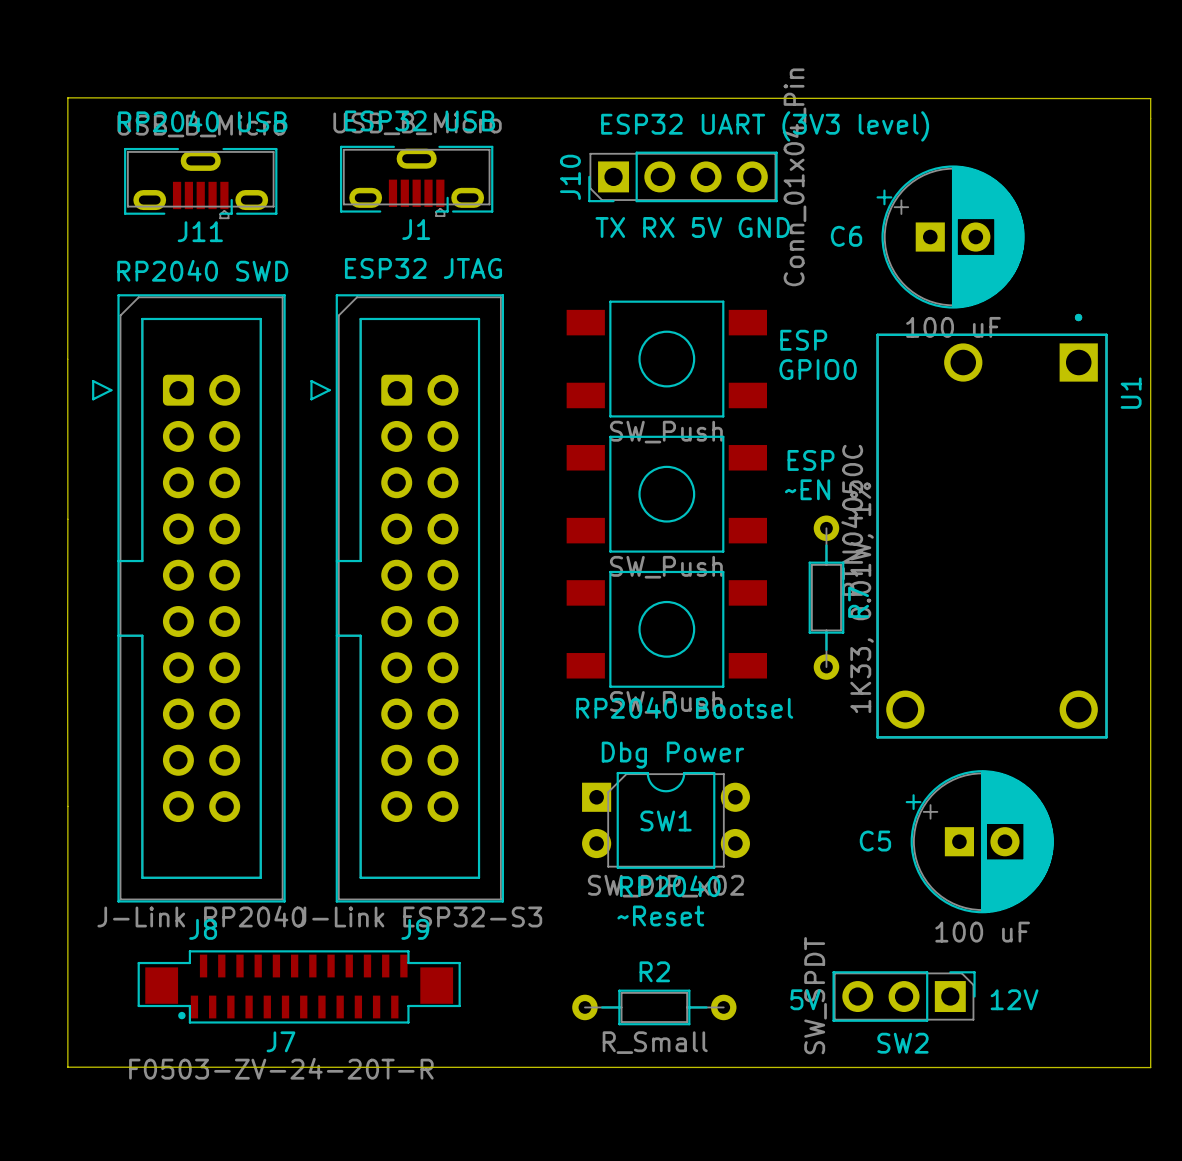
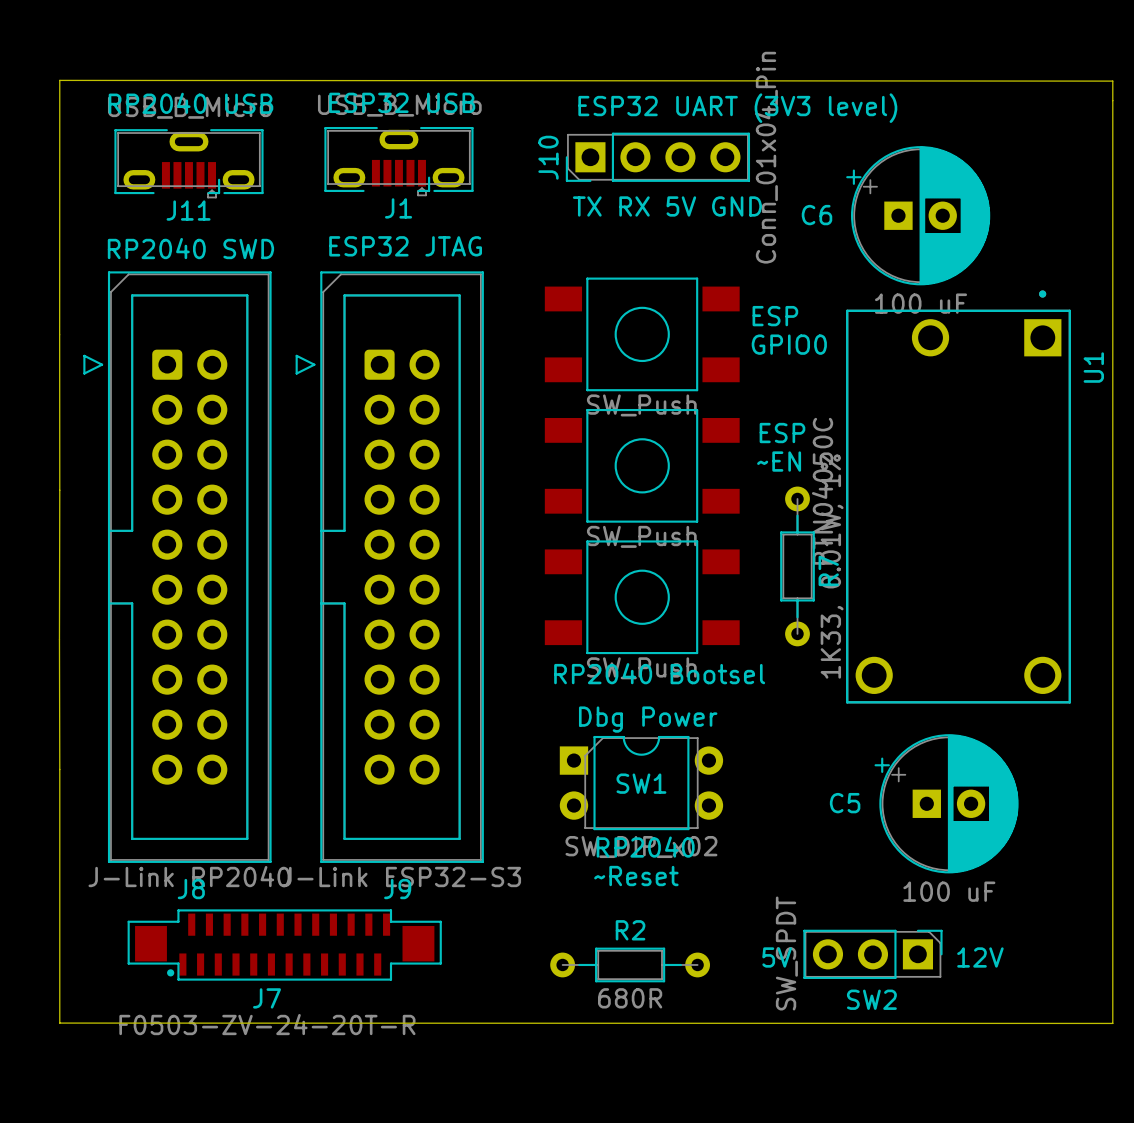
R2 value: R_Small (655, 1042) -> 680R (630, 998)

